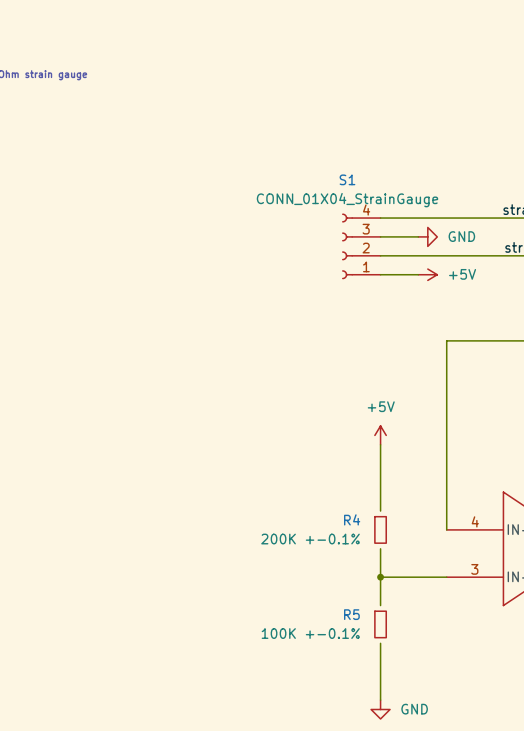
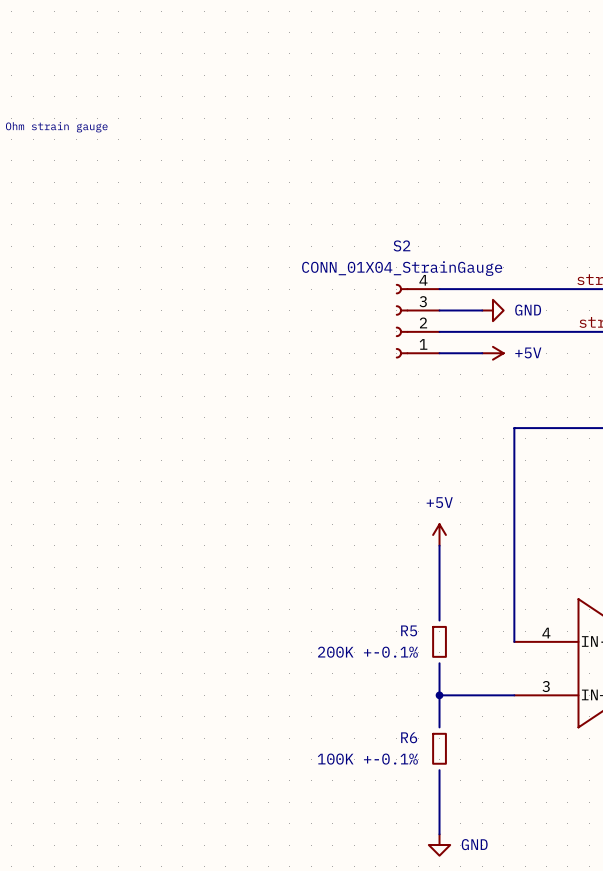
S1 name: S1 (347, 179) -> S2 (401, 245)
R4 name: R4 (352, 519) -> R5 (409, 630)
R5 name: R5 (351, 614) -> R6 (409, 737)

